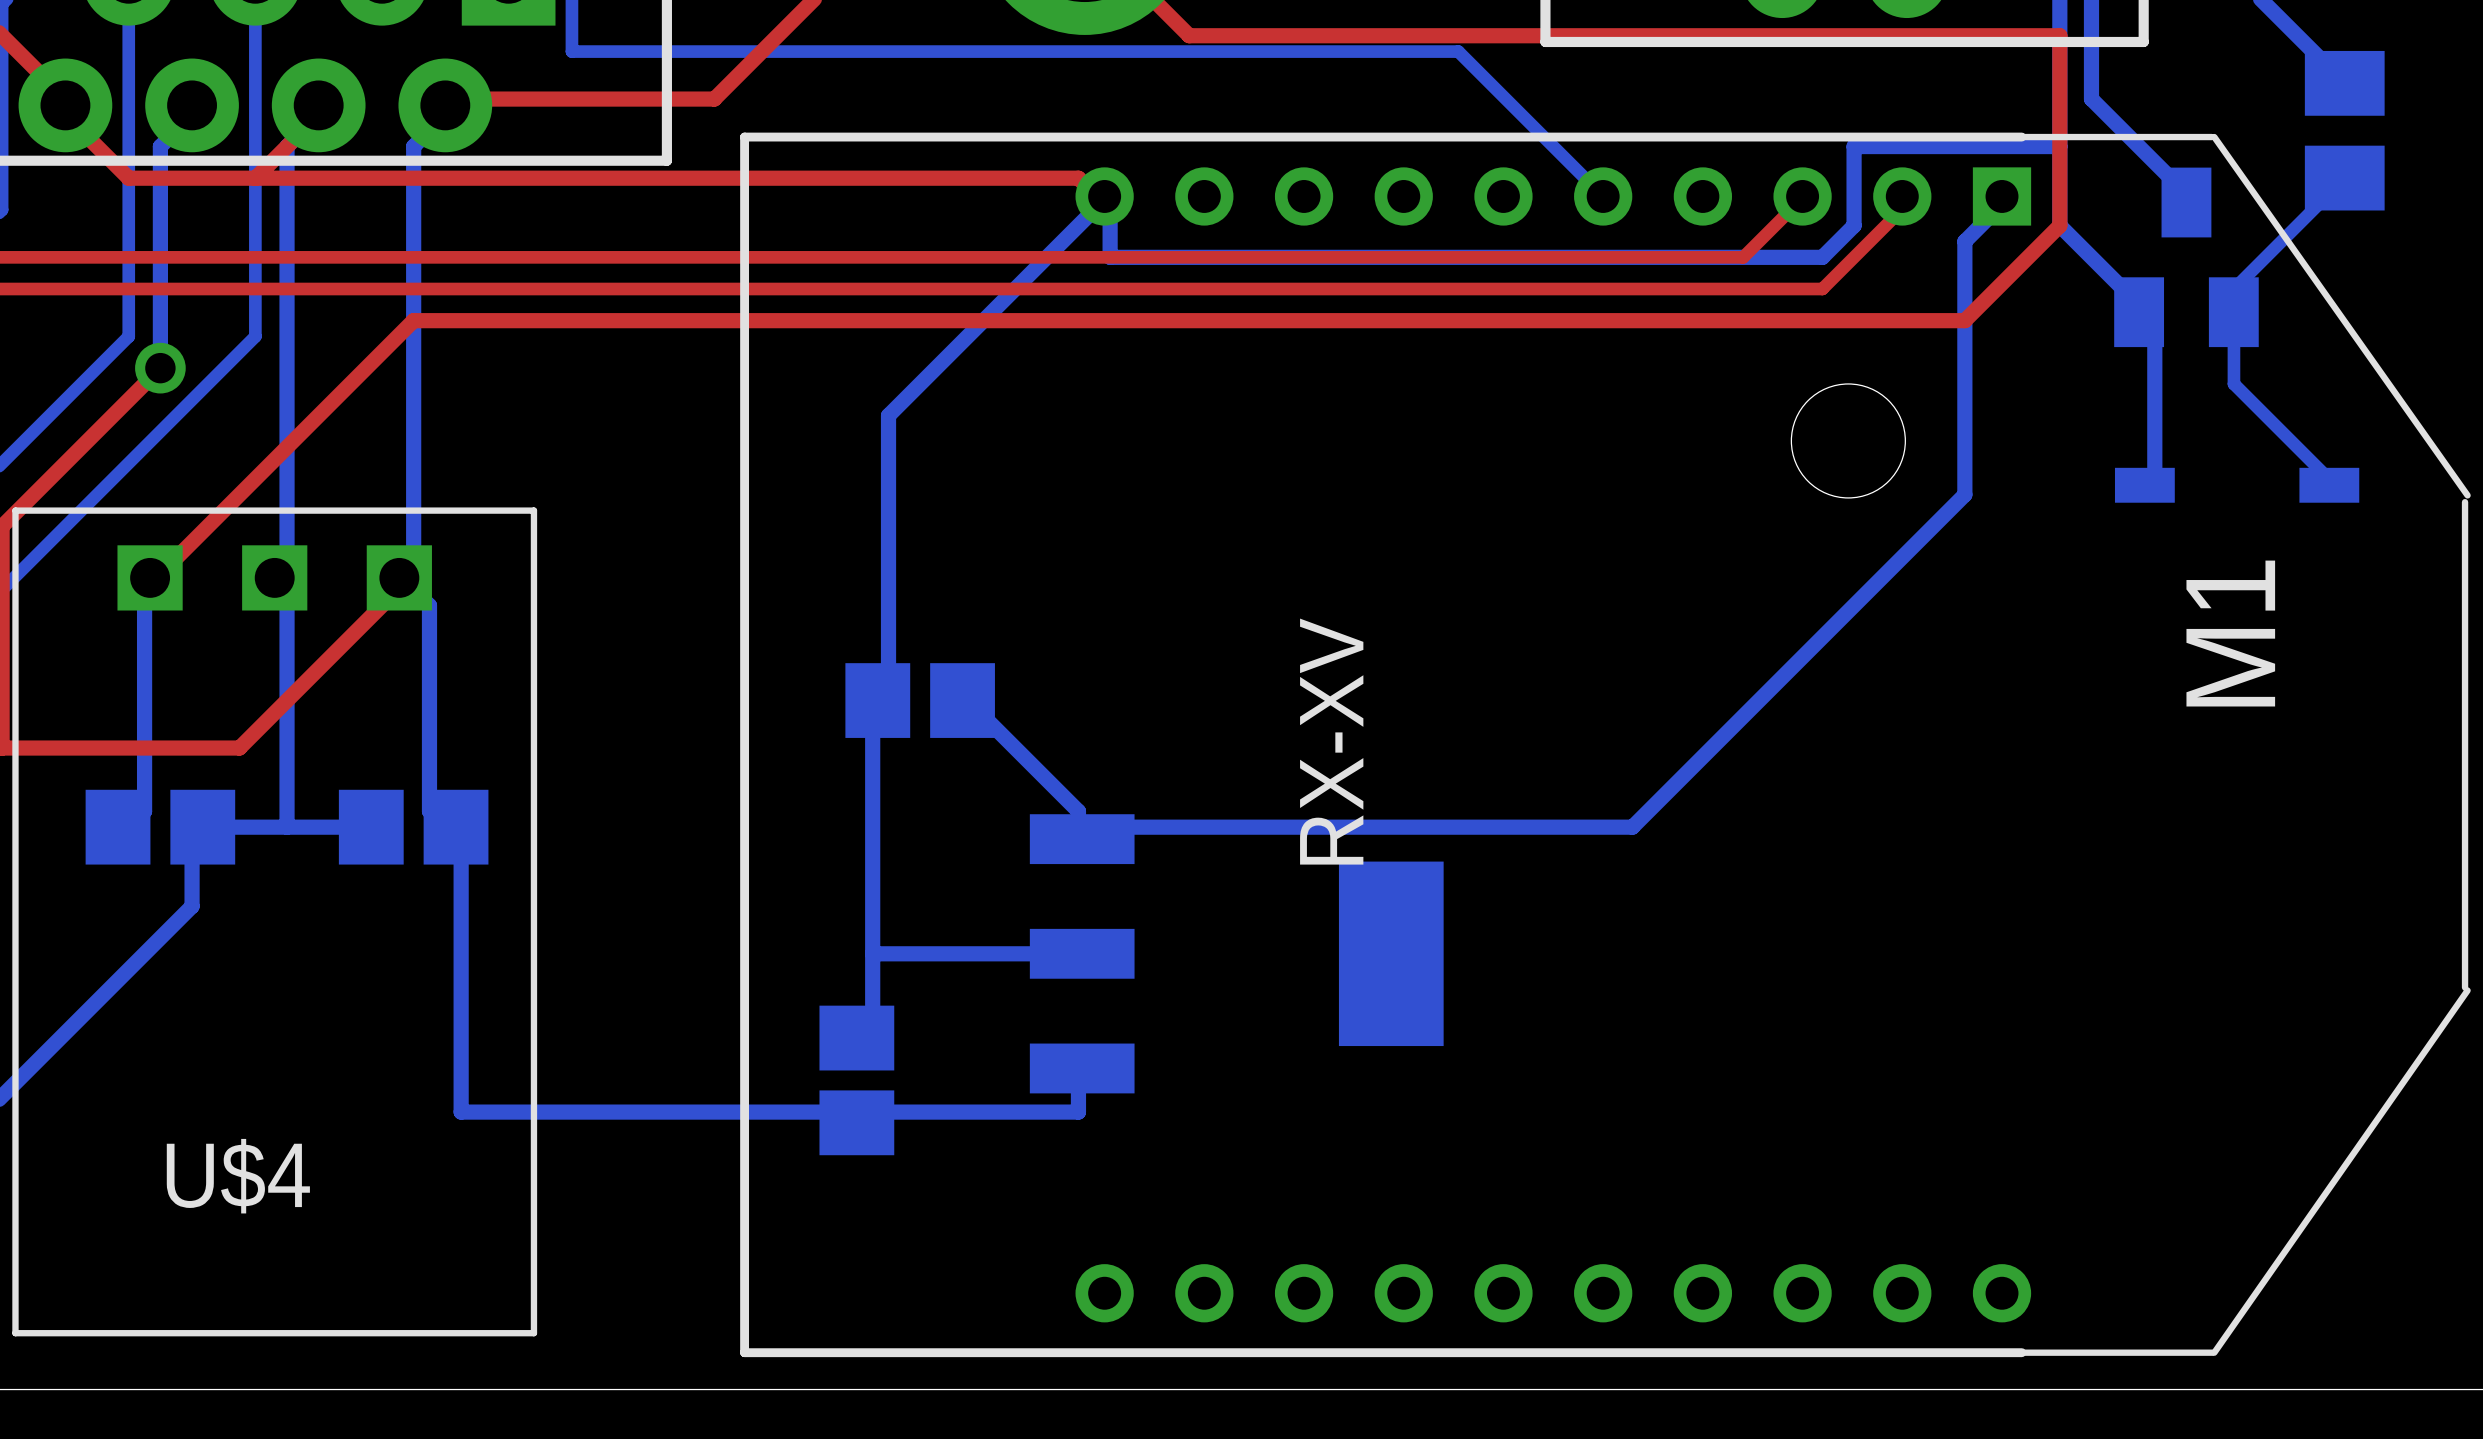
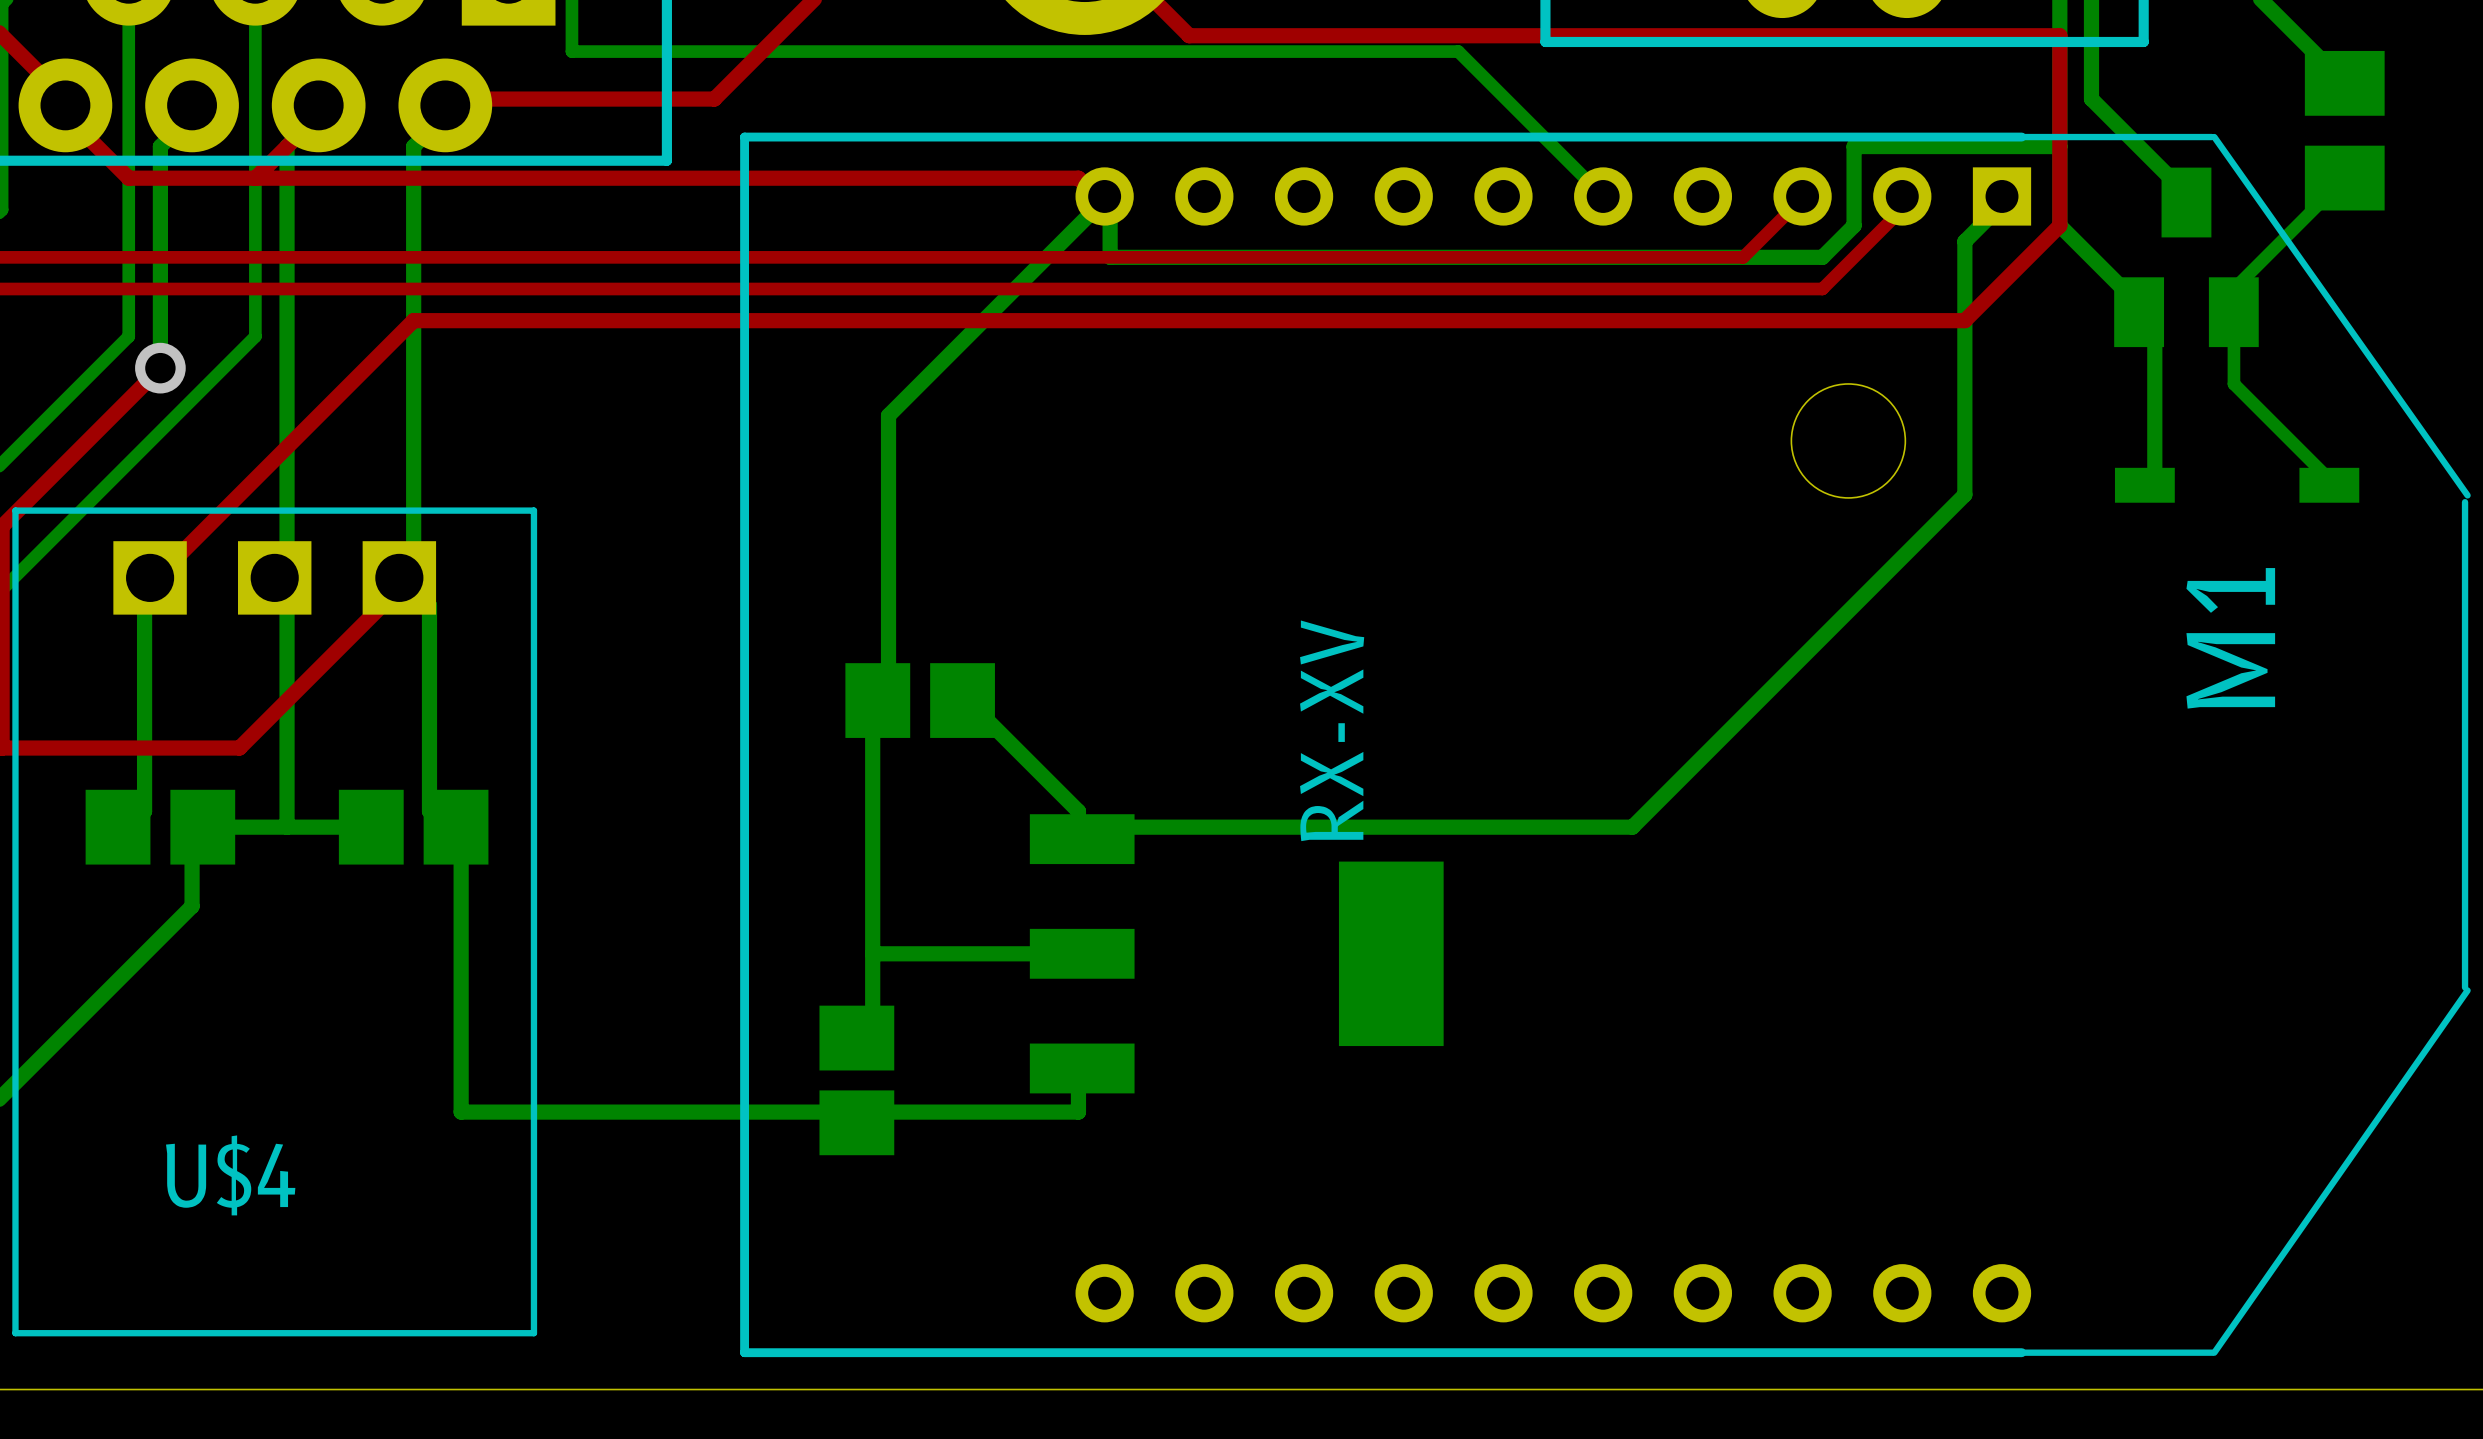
part footprint: [12, 507, 538, 1337] -> [12, 507, 538, 1337]

